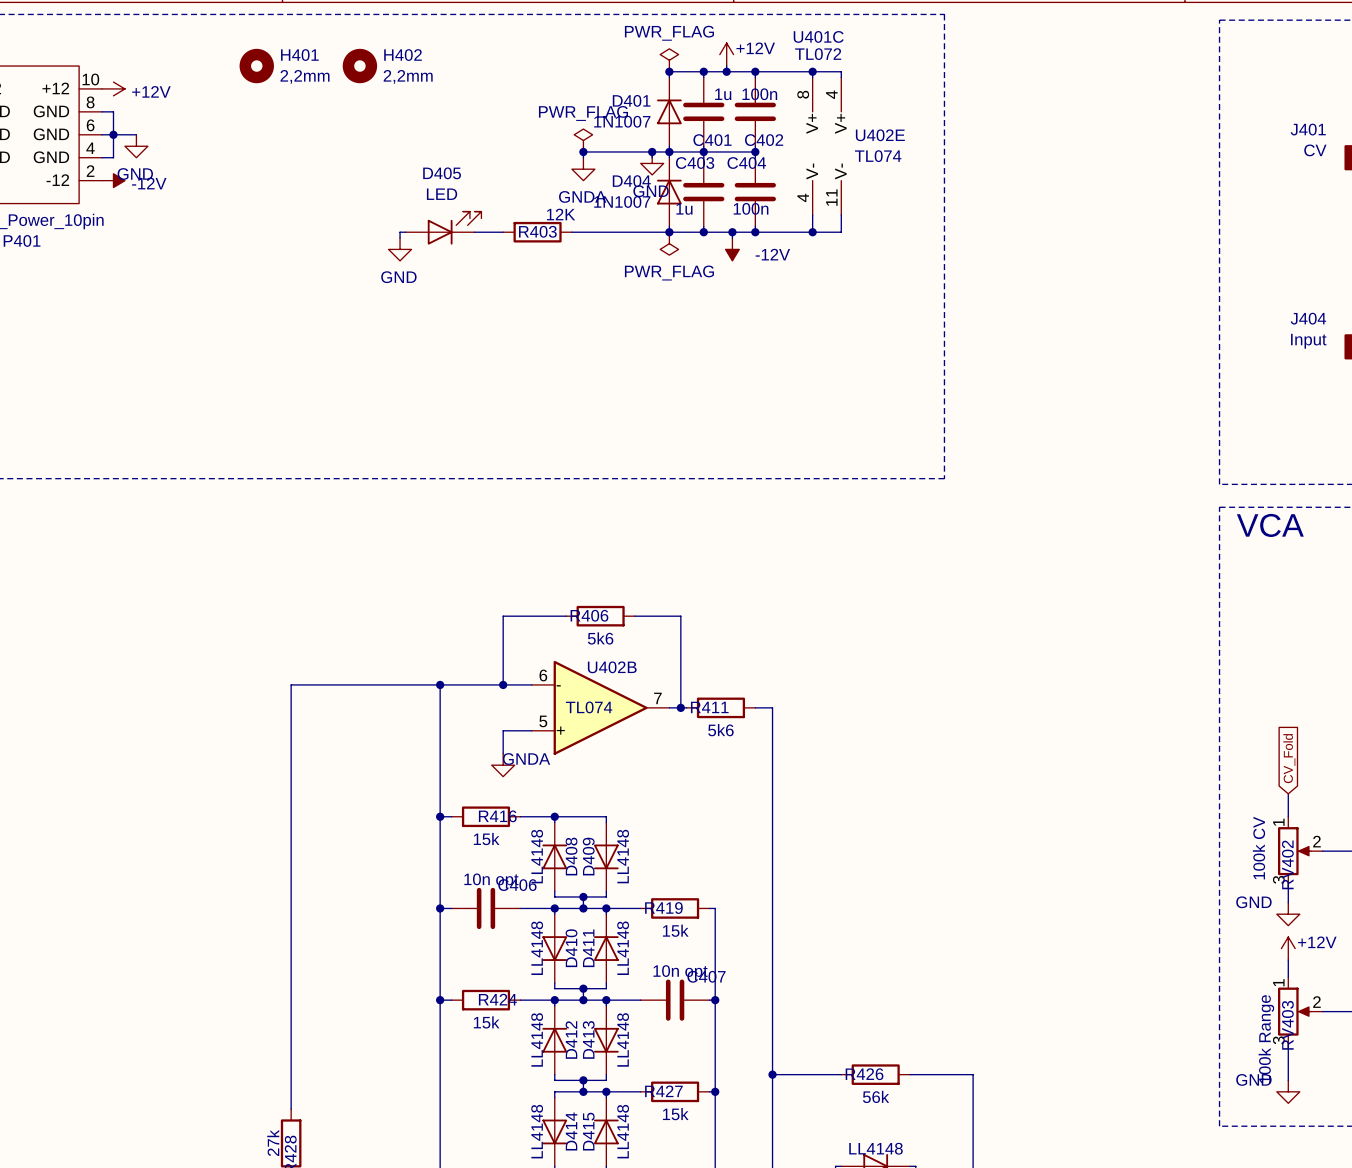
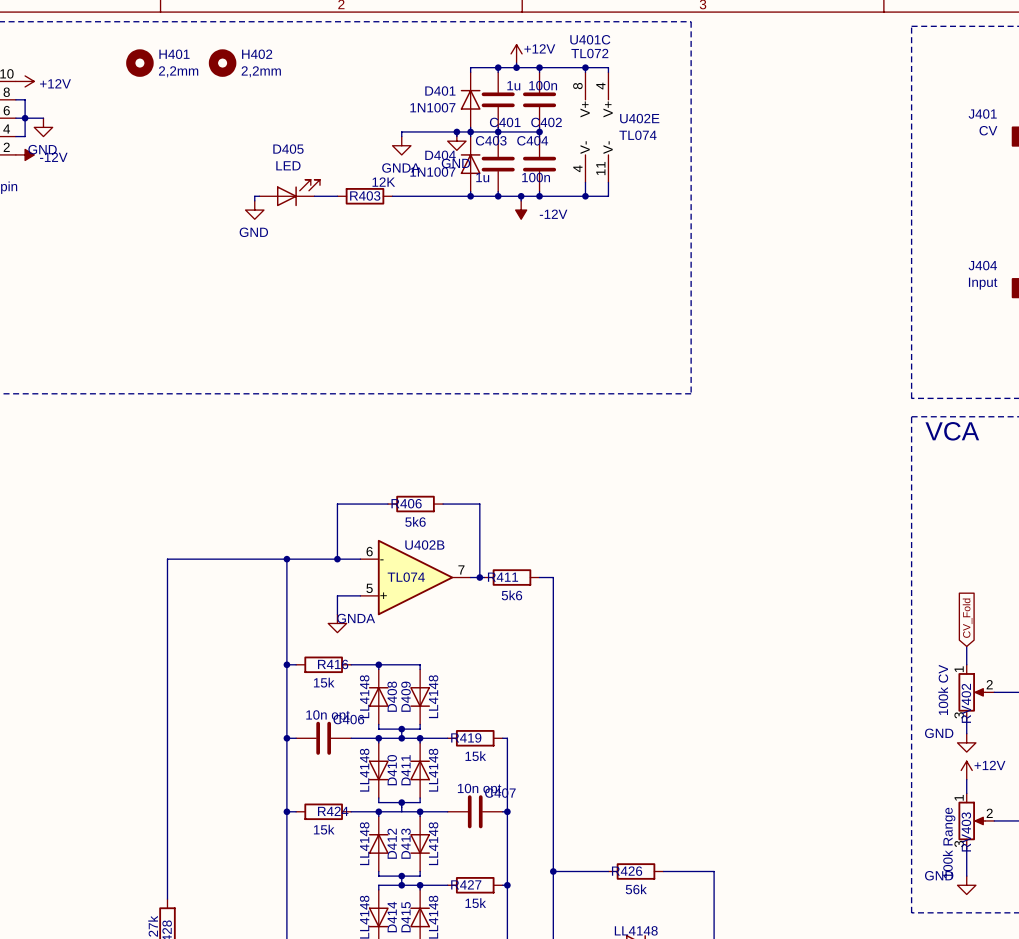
power symbol: PWR_FLAG (669, 60) -> none
junction: (669, 71) -> none
power symbol: PWR_FLAG (583, 140) -> none
junction: (583, 151) -> none
power symbol: PWR_FLAG (669, 243) -> none
junction: (583, 1000) -> none

